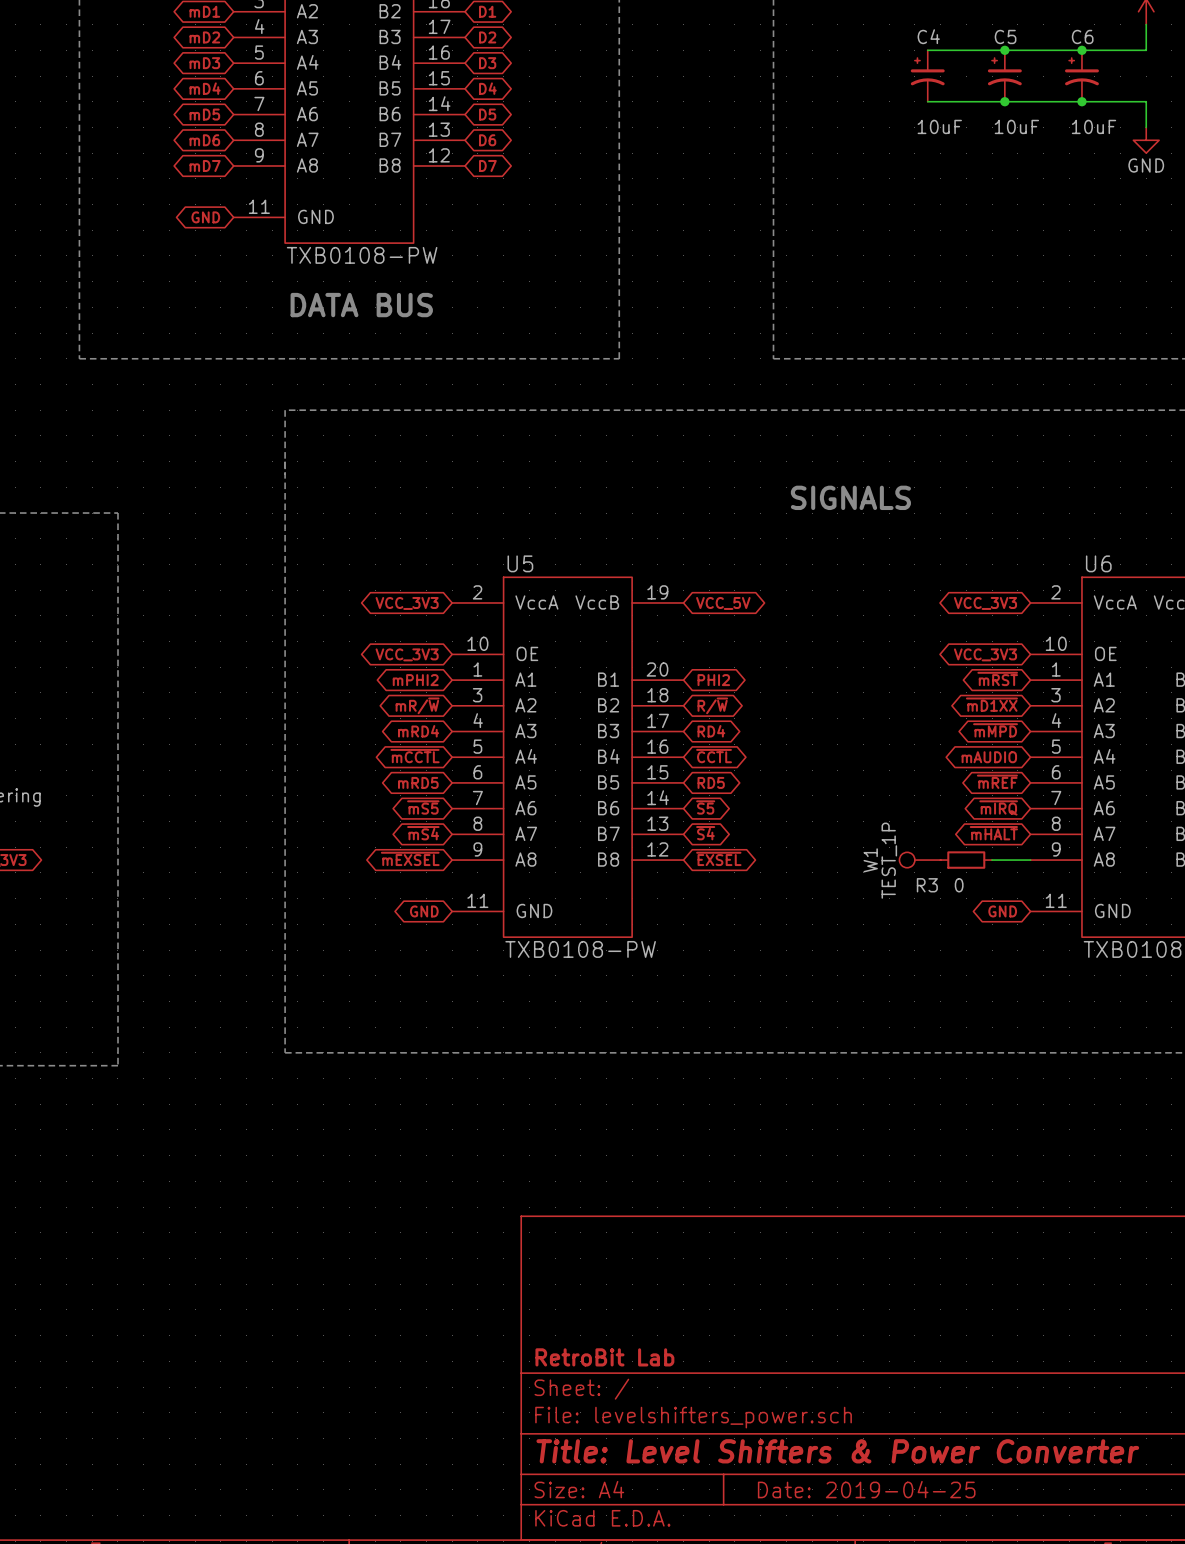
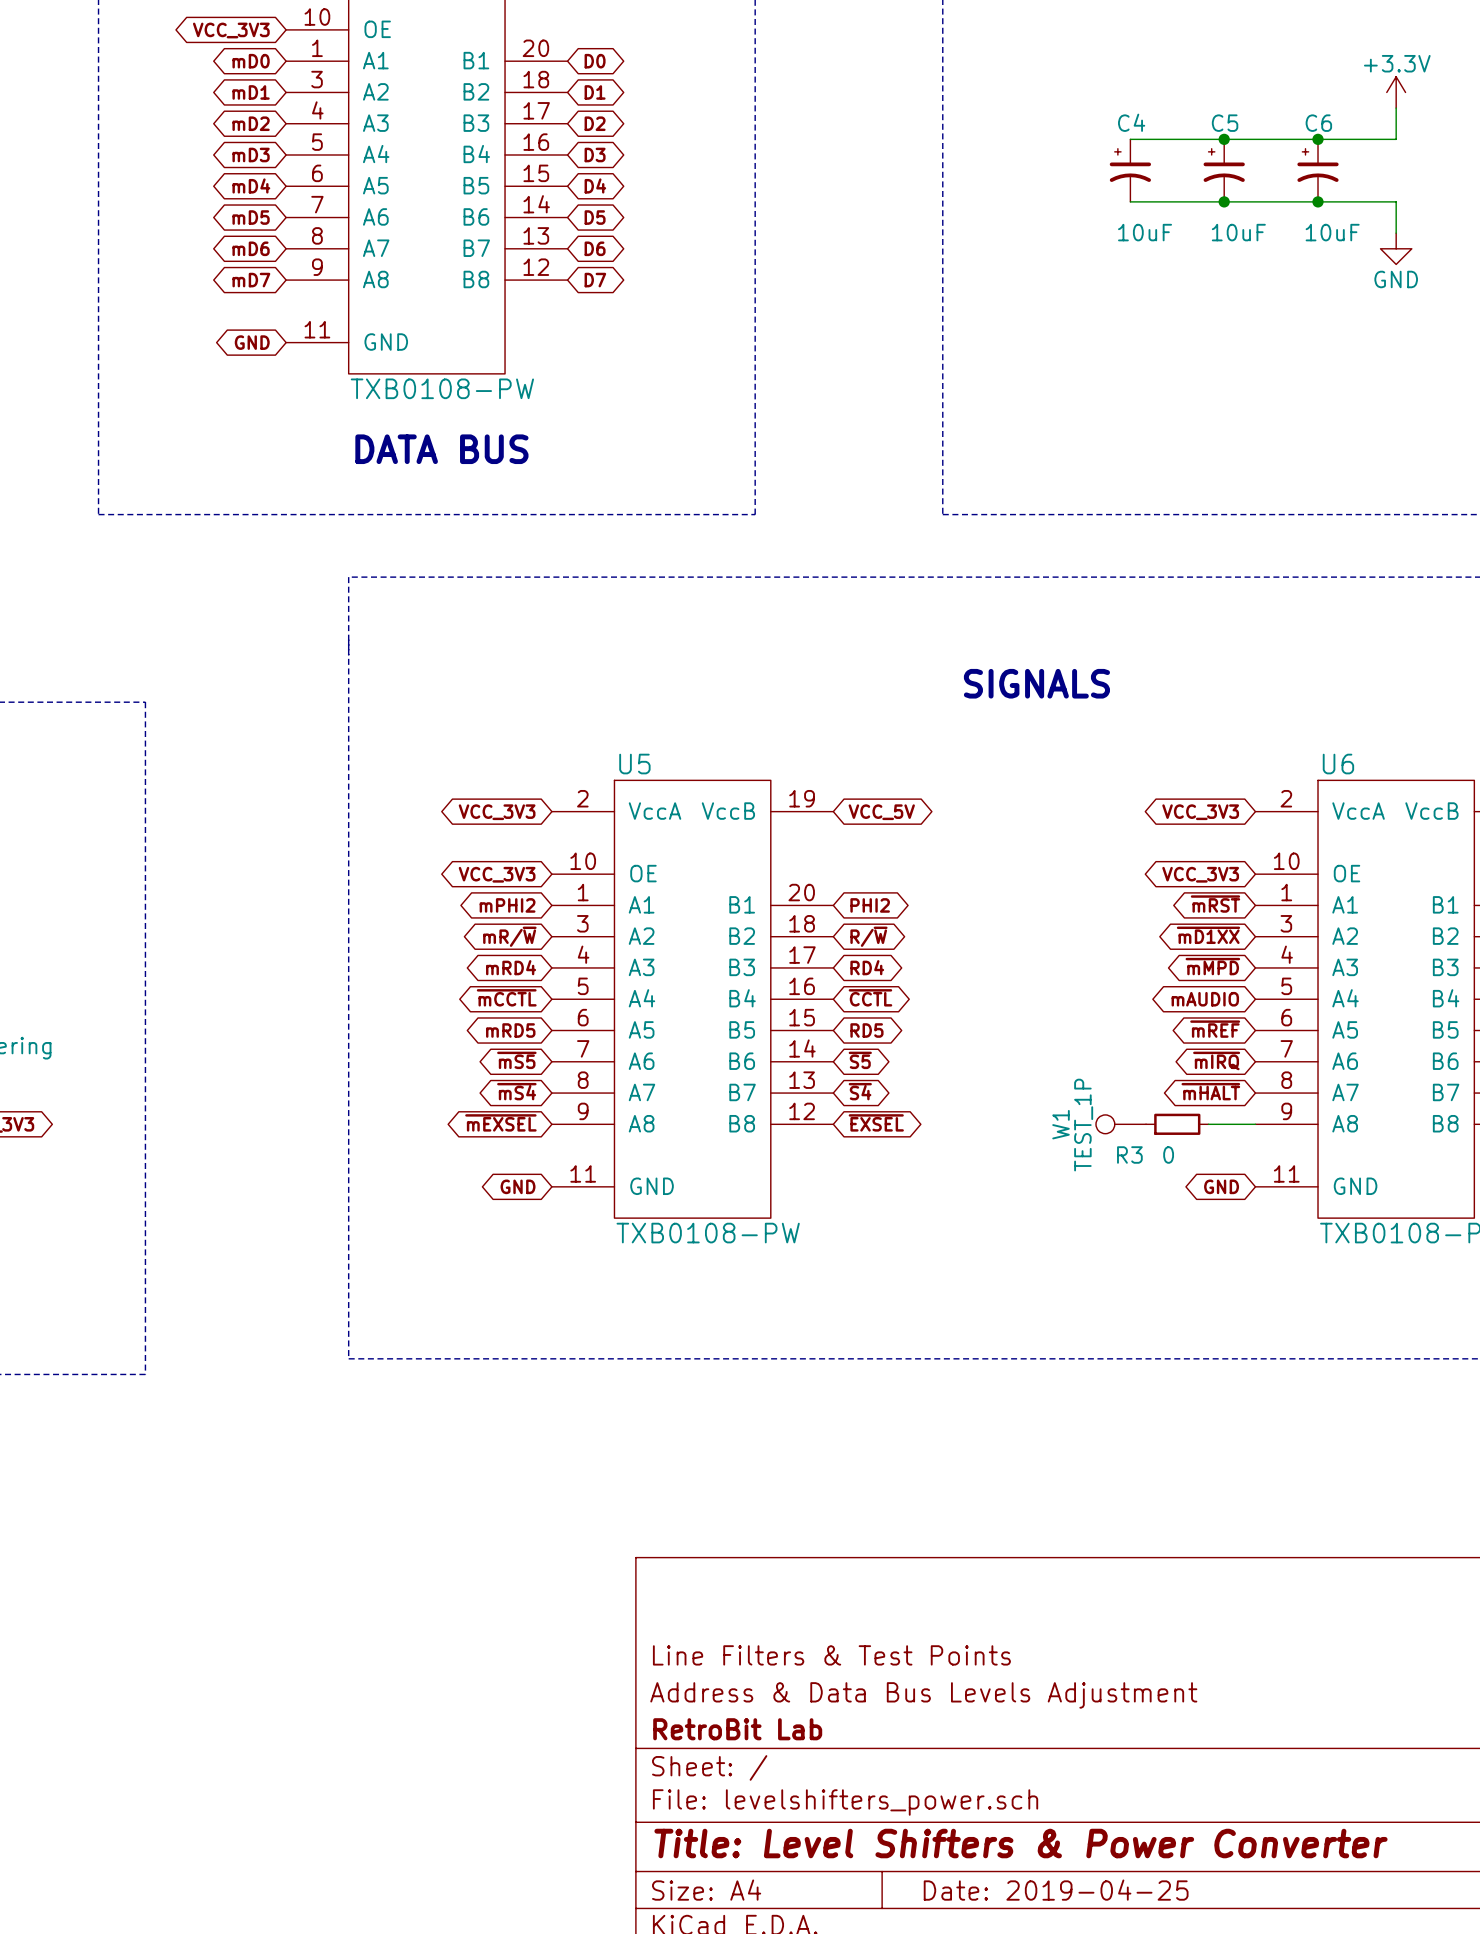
title block: none -> Line Filters & Test Points (831, 1655)
title block: none -> Address & Data Bus Levels Adjustment (923, 1695)

